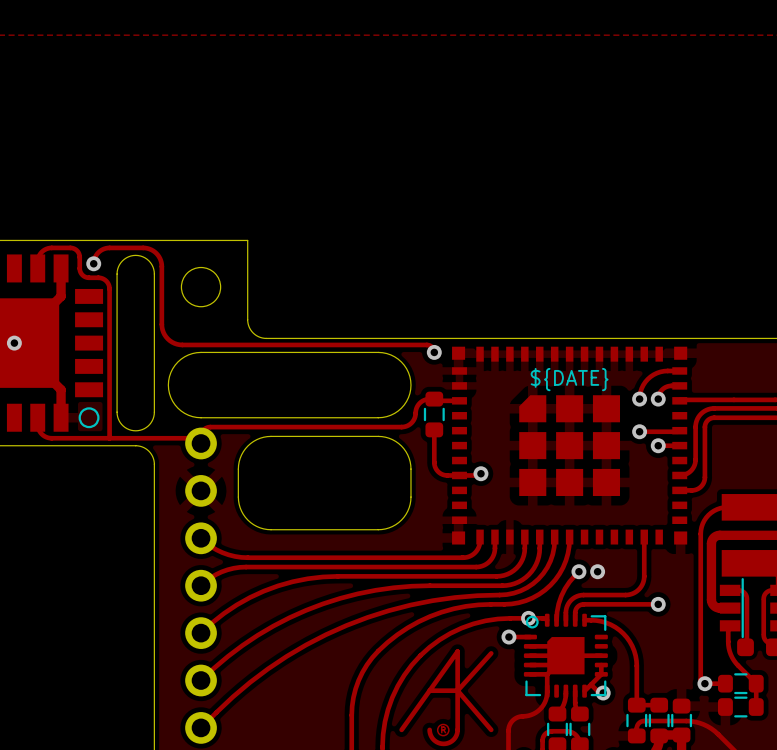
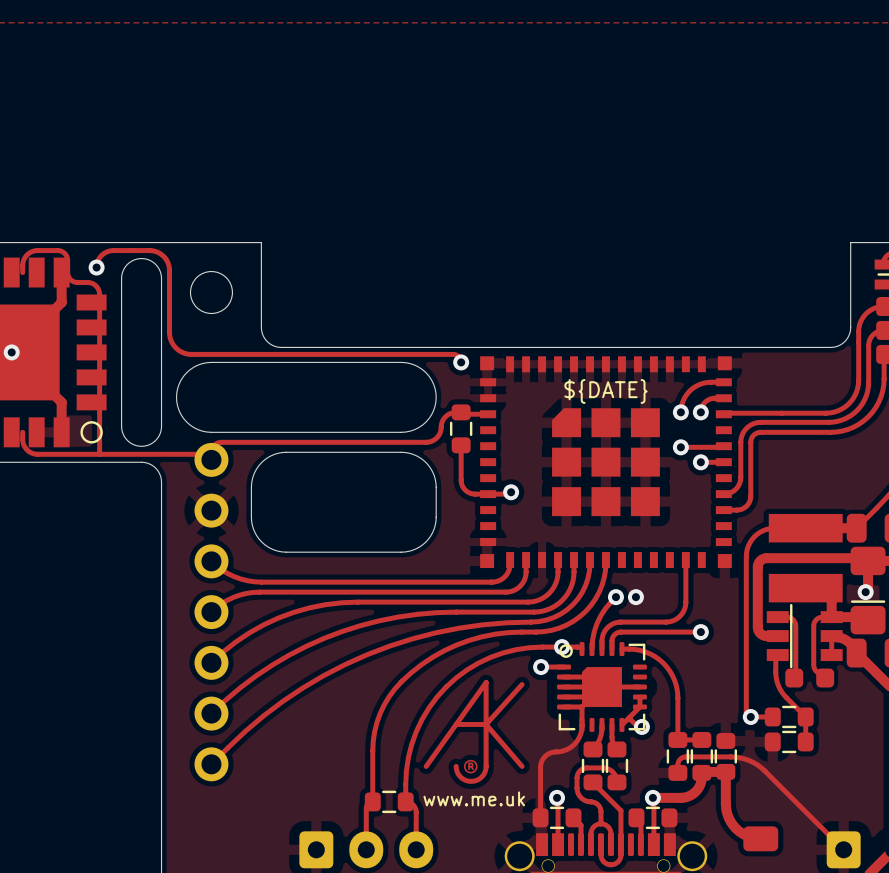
track: (51, 247) (40, 253) (37, 268) -> (51, 250) (35, 250) (28, 253) (23, 261) (22, 272)
track: (57, 247) (76, 249) (79, 254) (79, 269) (82, 275) (87, 277) (102, 278) (109, 286) (109, 438) -> (57, 250) (62, 251) (66, 256) (67, 273) (70, 279) (76, 282) (92, 283) (99, 291) (99, 454)
track: (37, 417) (40, 432) (51, 438) -> (22, 432) (23, 443) (28, 451) (35, 454) (51, 454)

